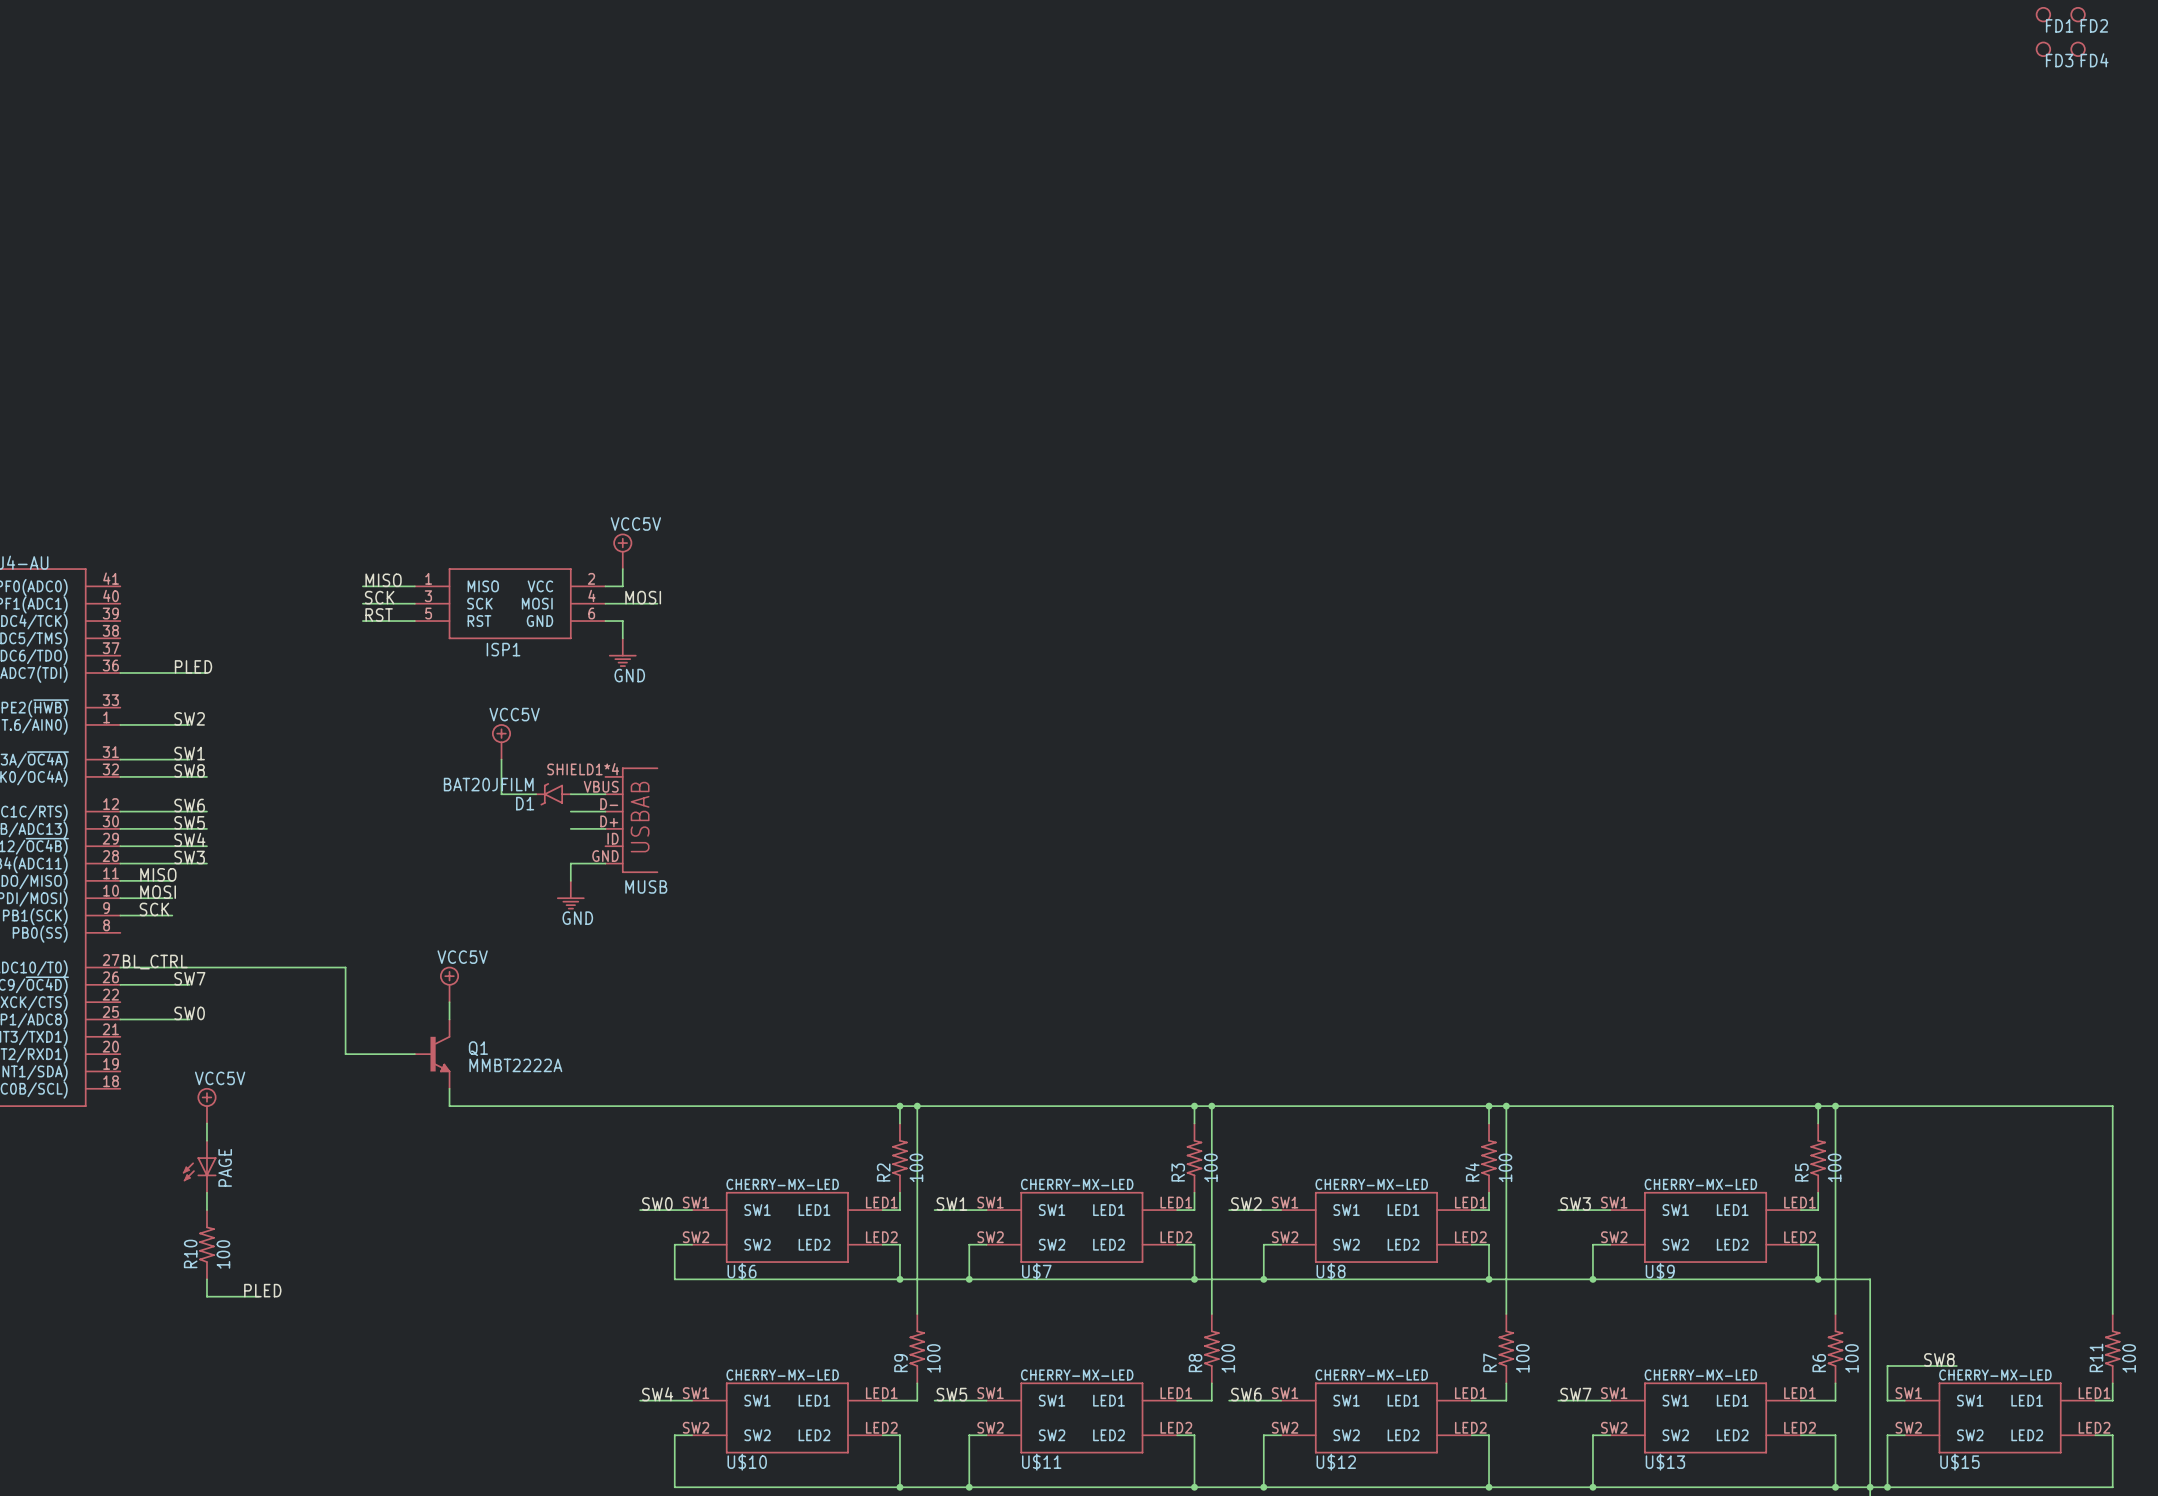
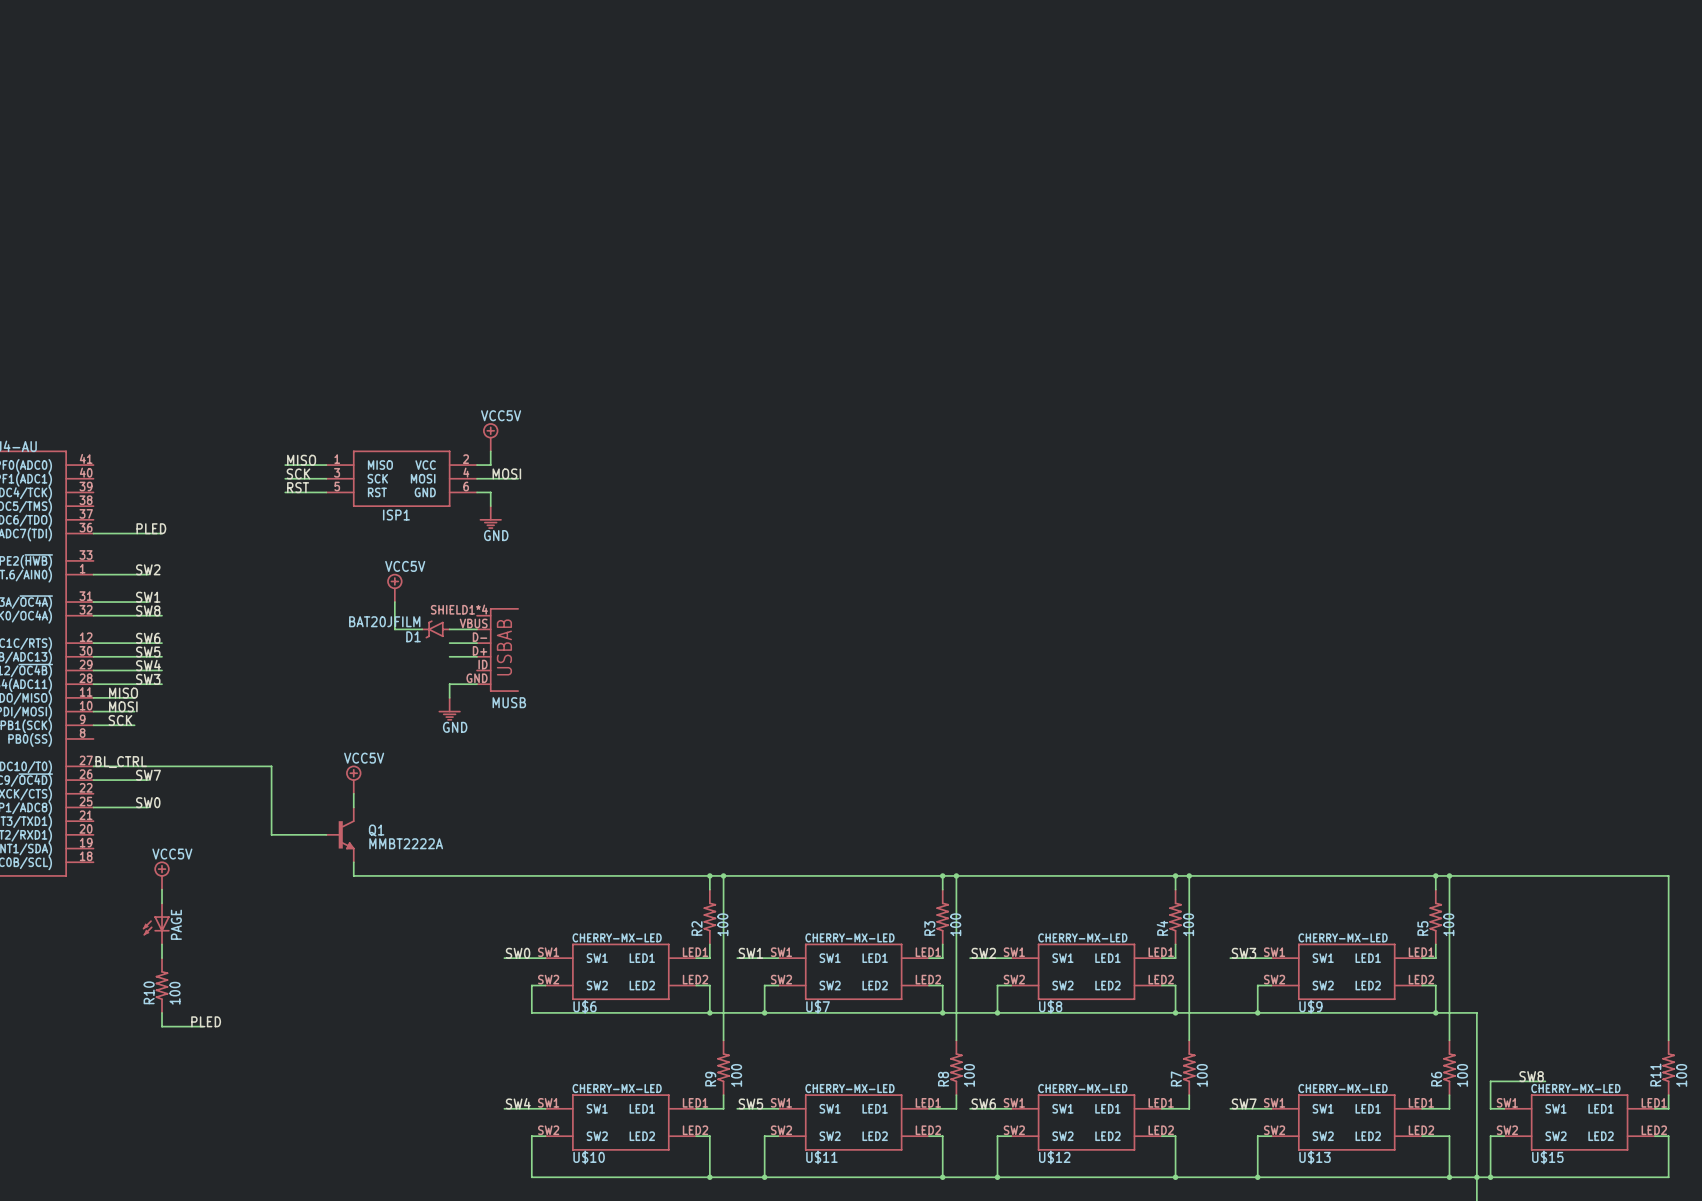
FD1: (2043, 14) -> none
FD2: (2078, 14) -> none
FD3: (2043, 49) -> none
FD4: (2078, 49) -> none

